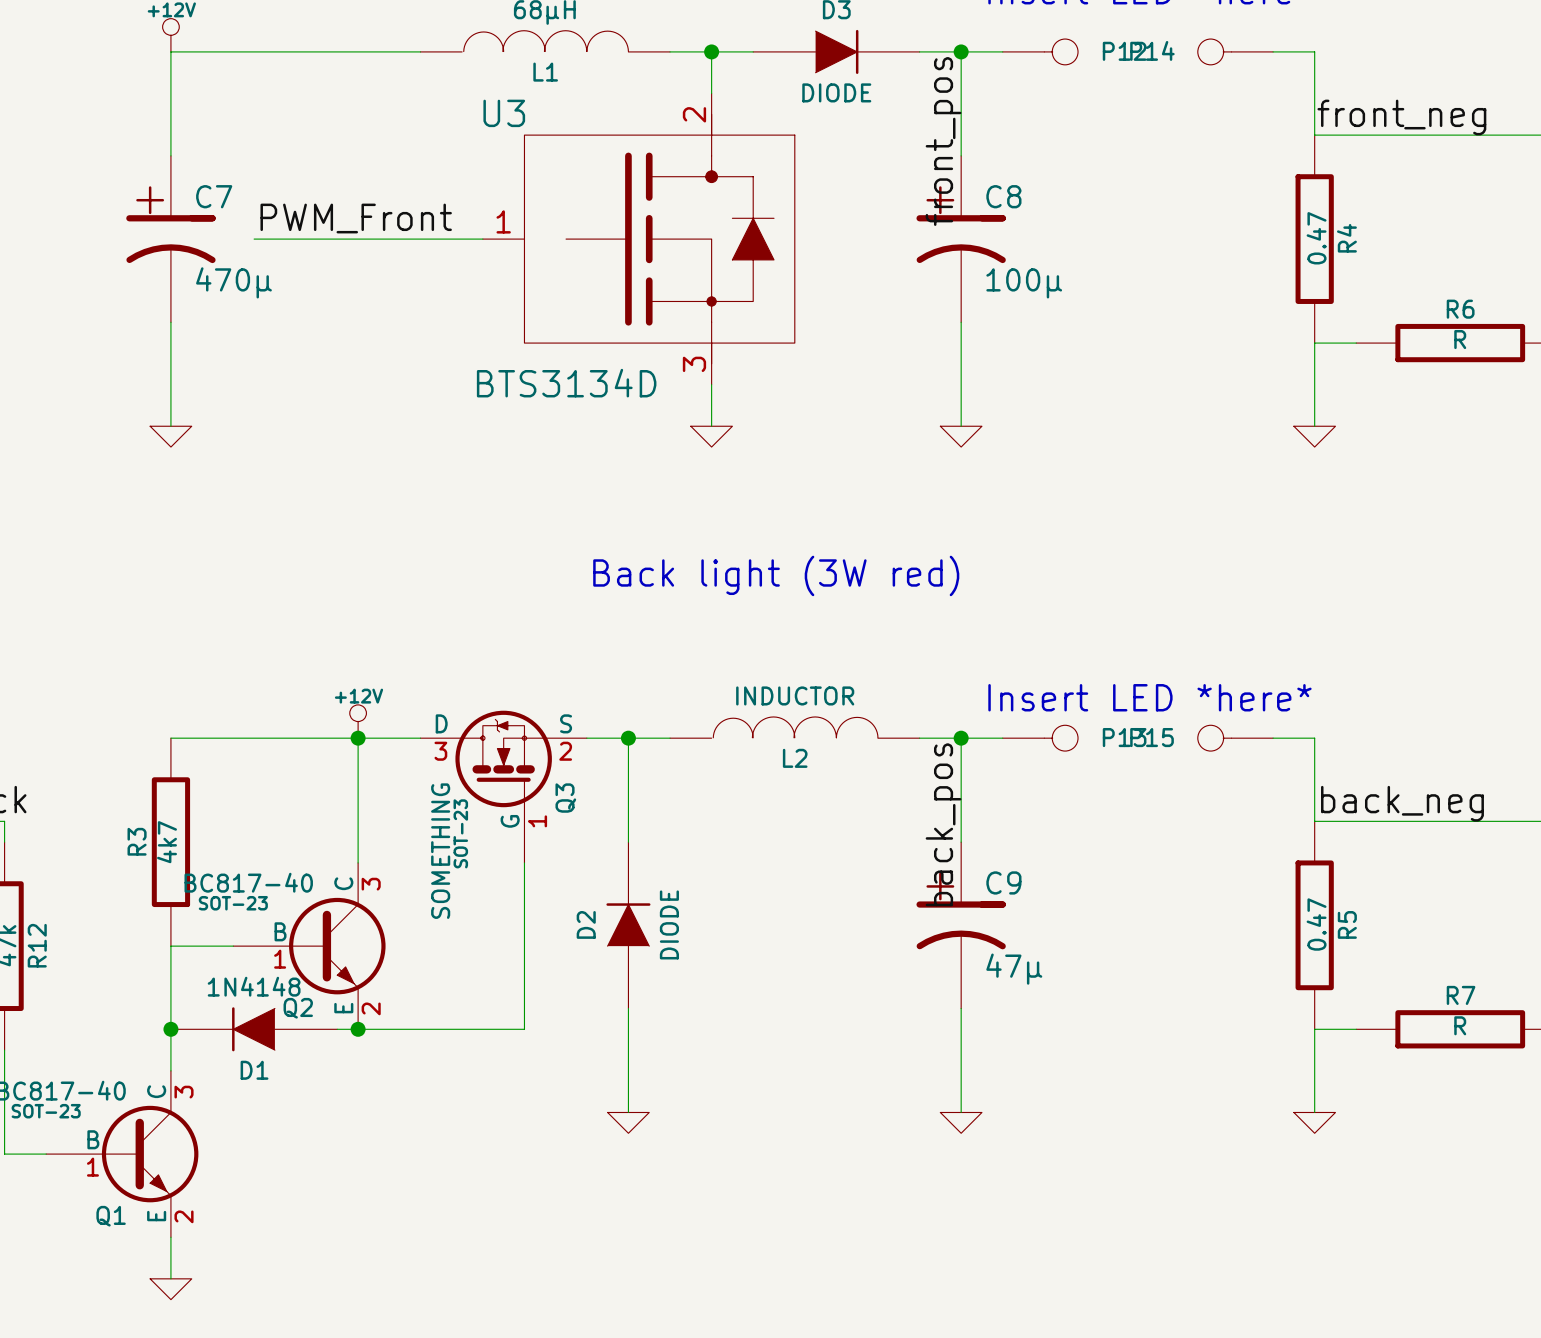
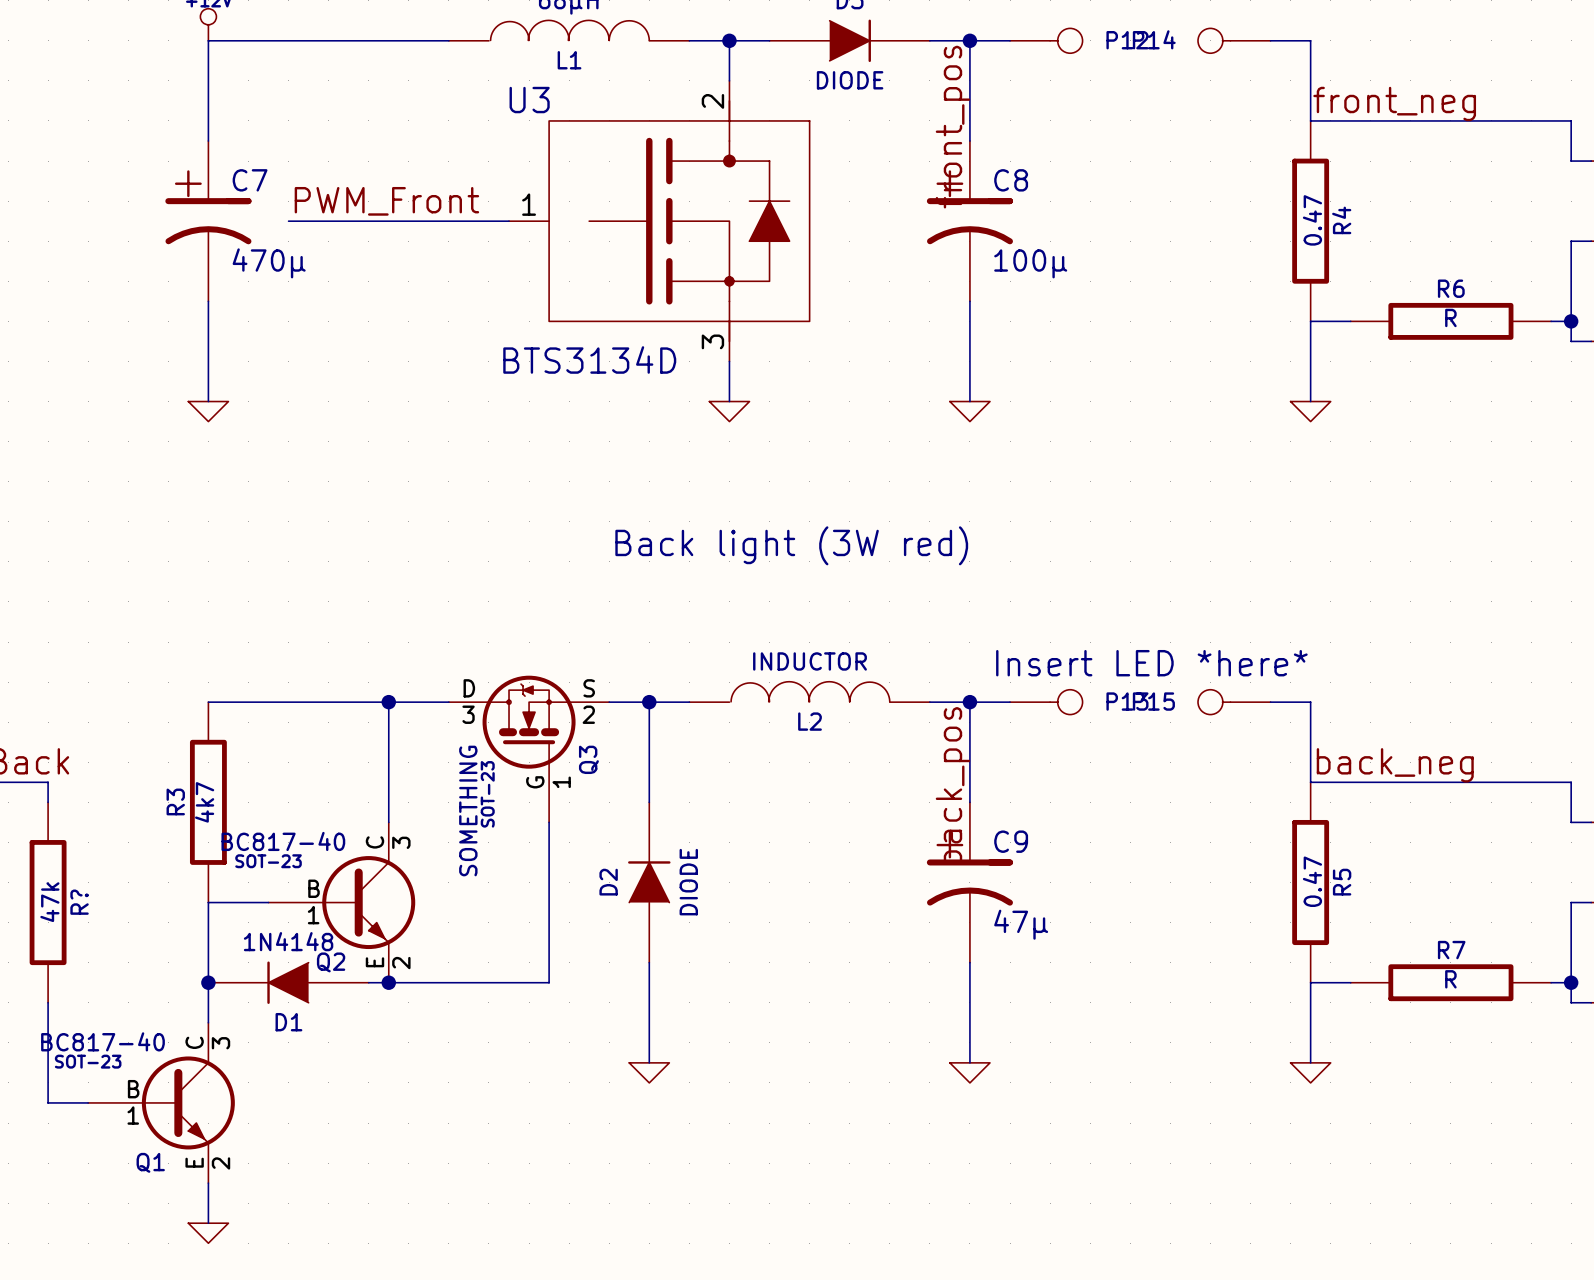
power symbol: +12V (358, 721) -> none
R12 name: R12 (37, 945) -> R? (79, 902)

